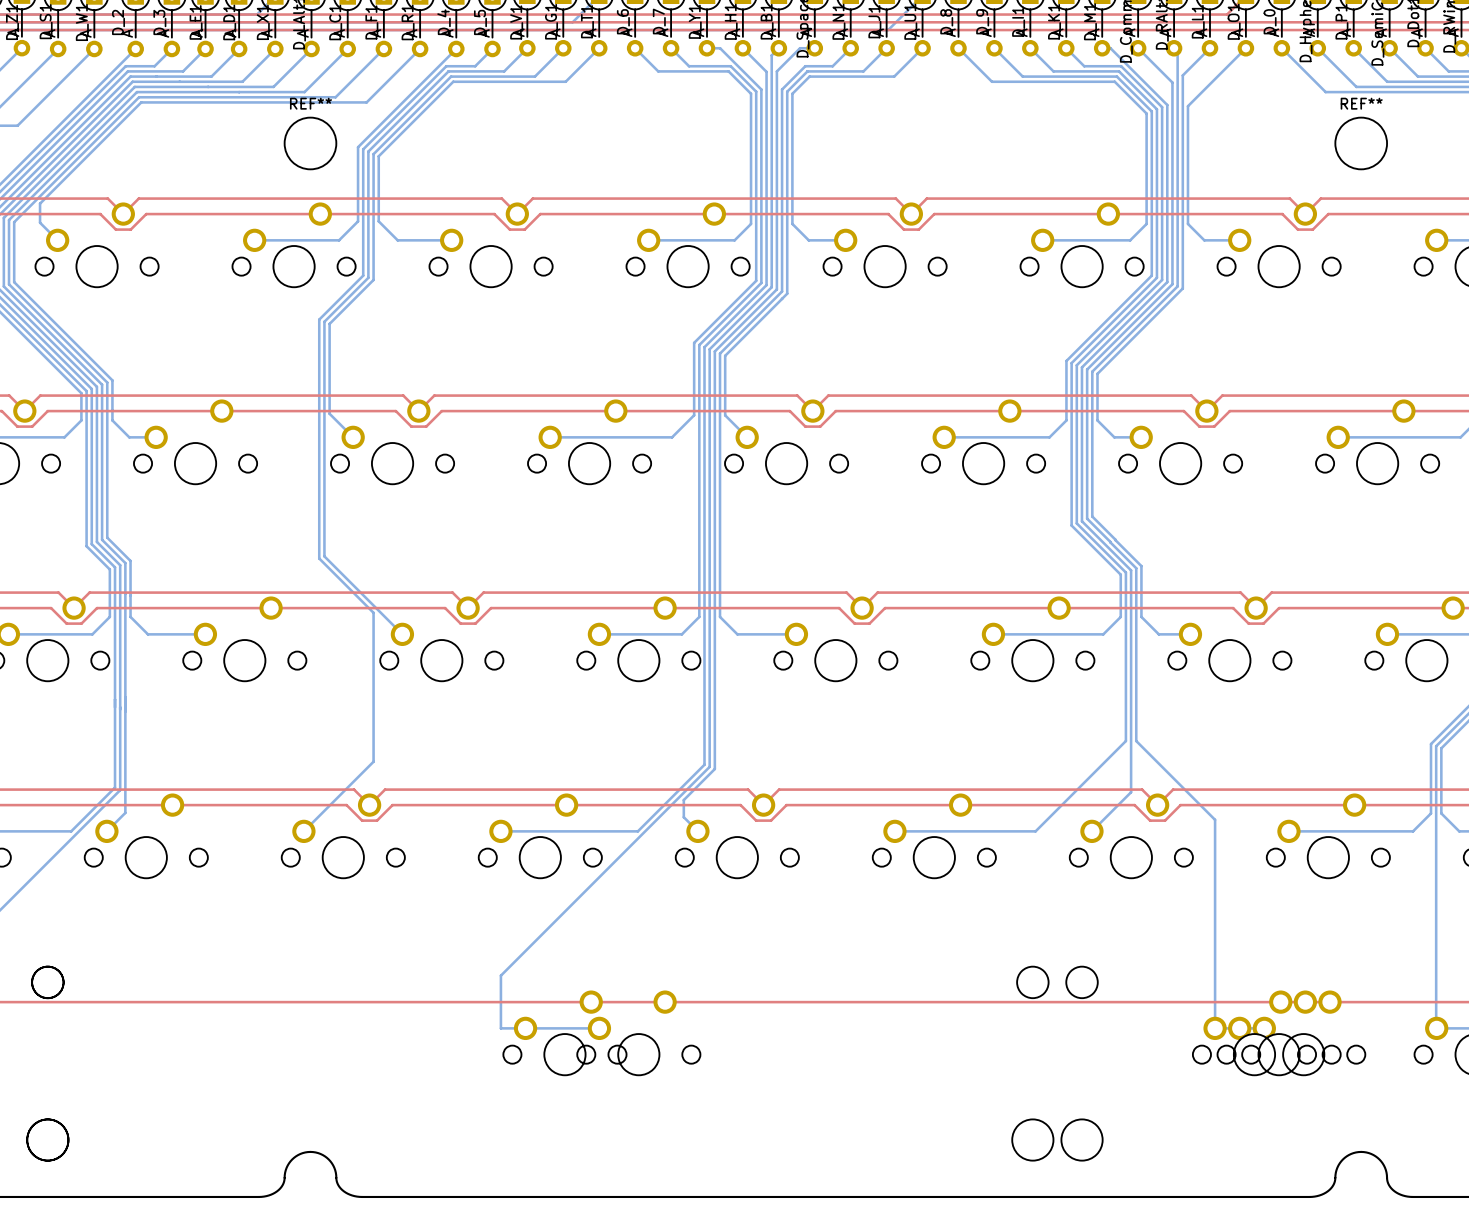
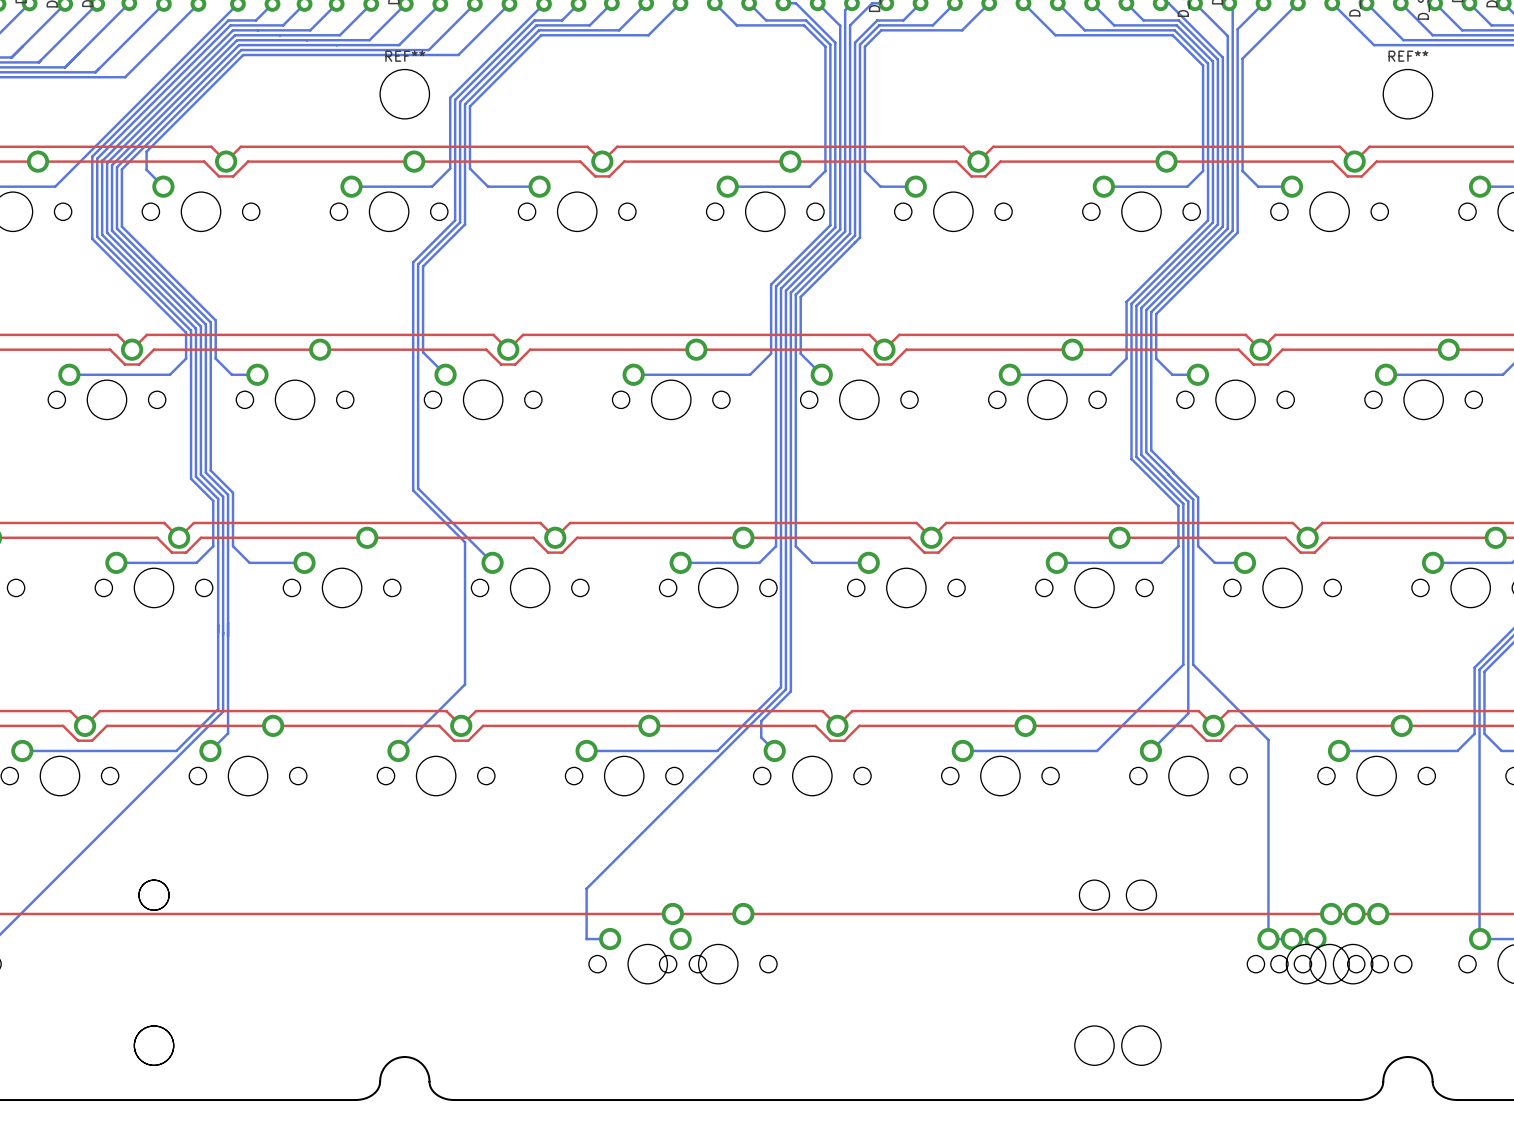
bottom track: (525, 1028) (599, 1028) -> none

